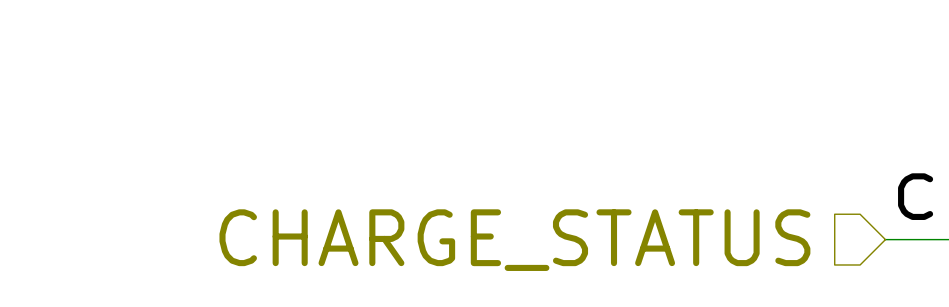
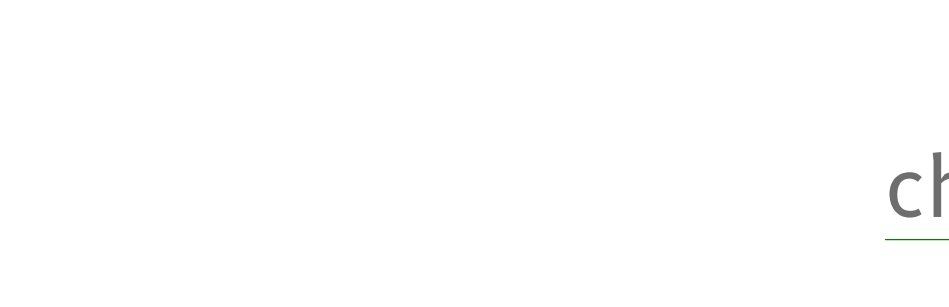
hierarchical label: CHARGE_STATUS (514, 240) -> none

